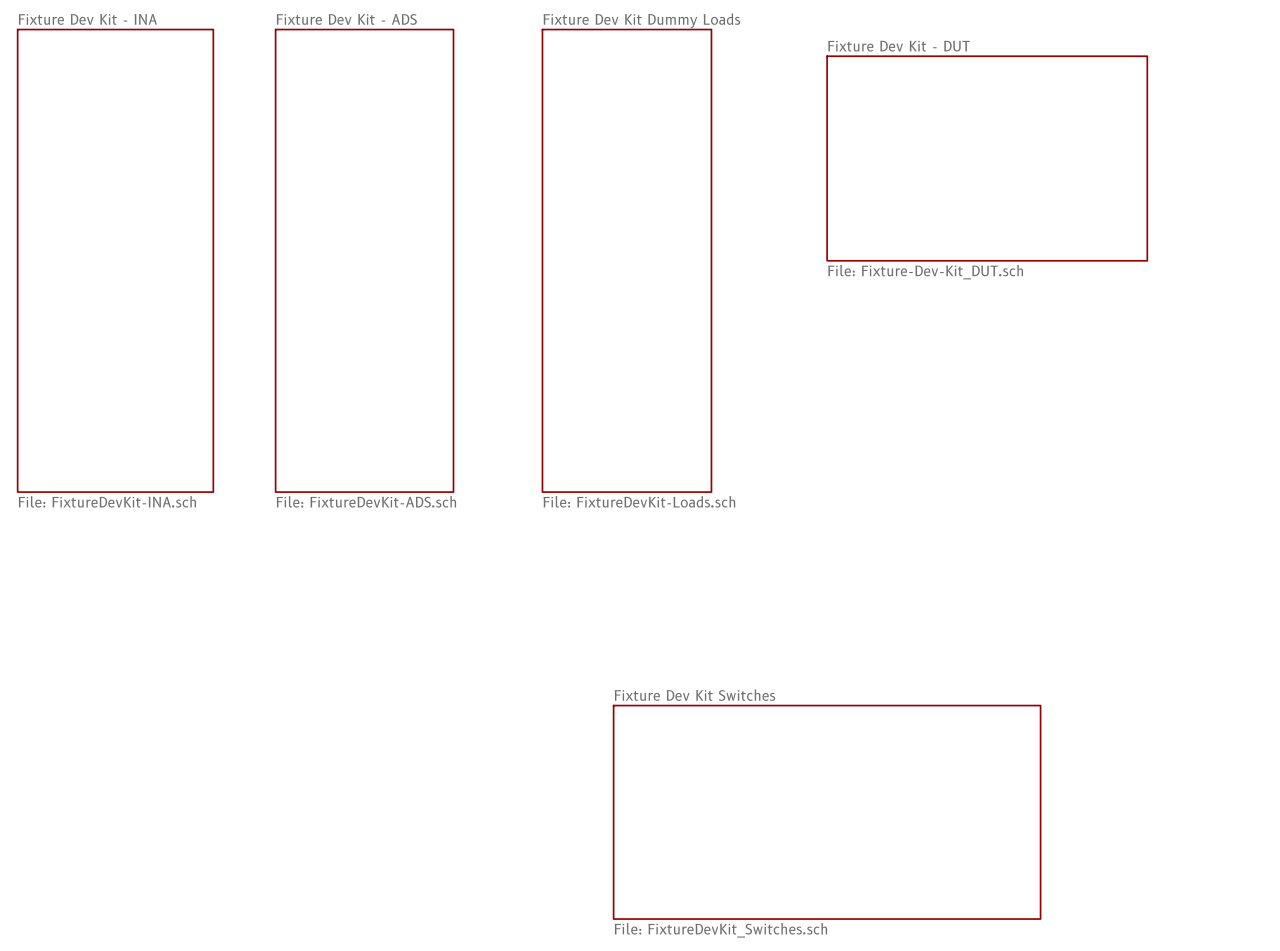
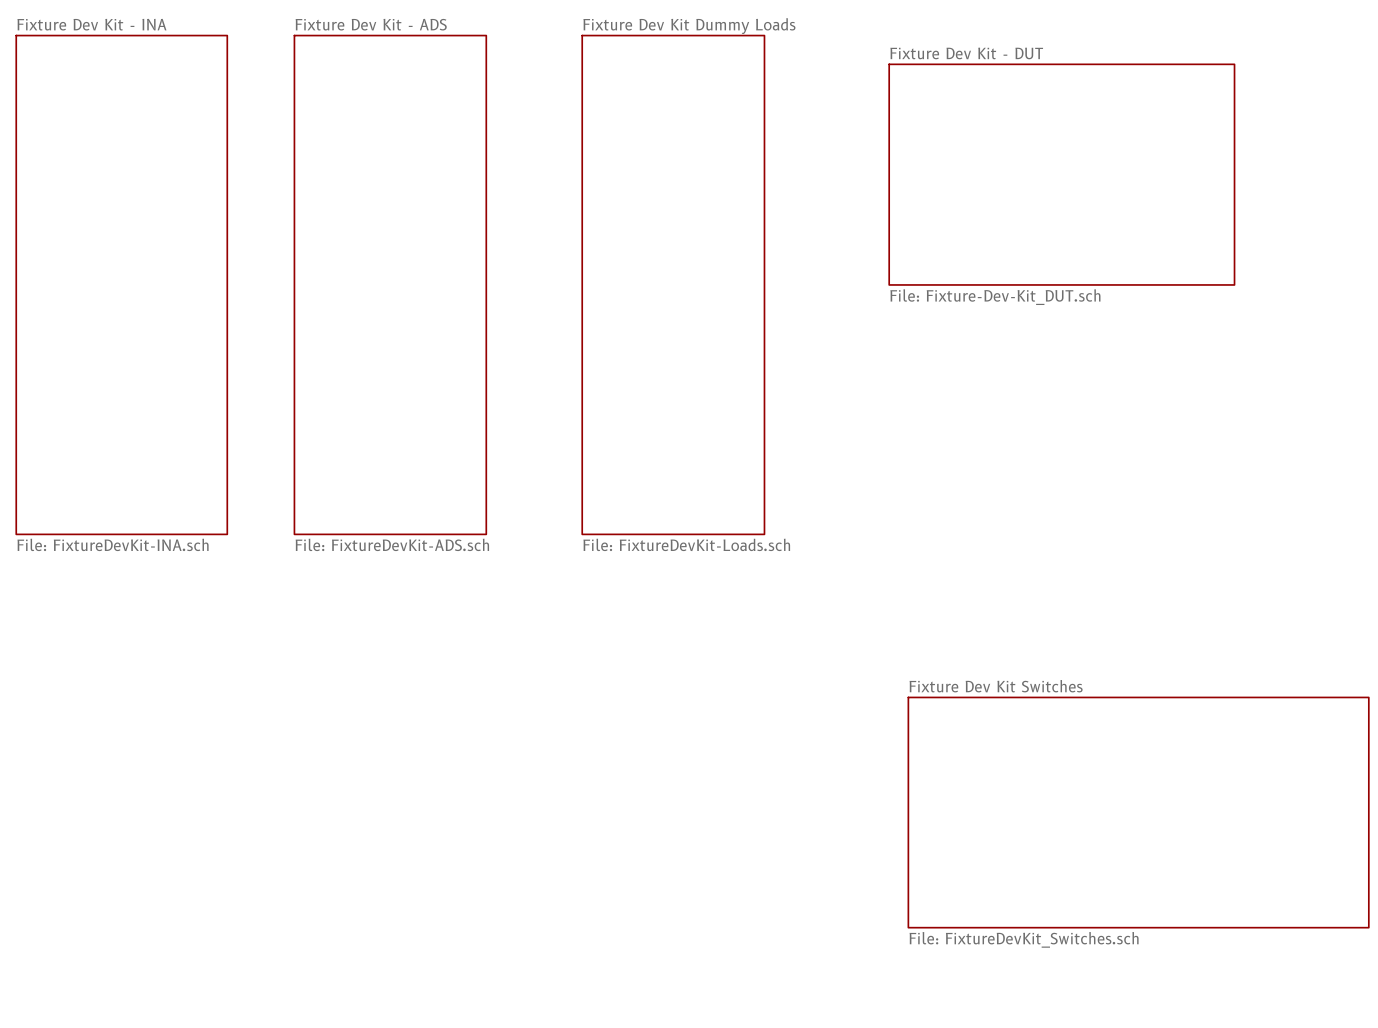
sheet Fixture Dev Kit Switches: none -> File: FixtureDevKit_Switches.sch (1138, 812)
sheet Fixture Dev Kit Switches: File: FixtureDevKit_Switches.sch (827, 812) -> none

